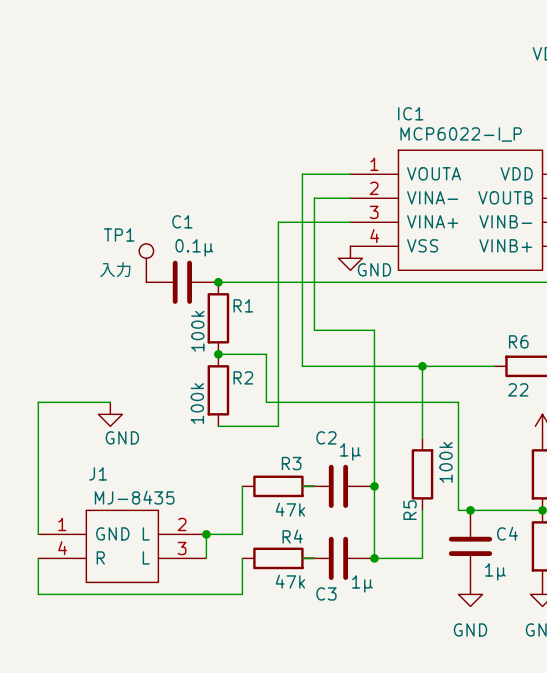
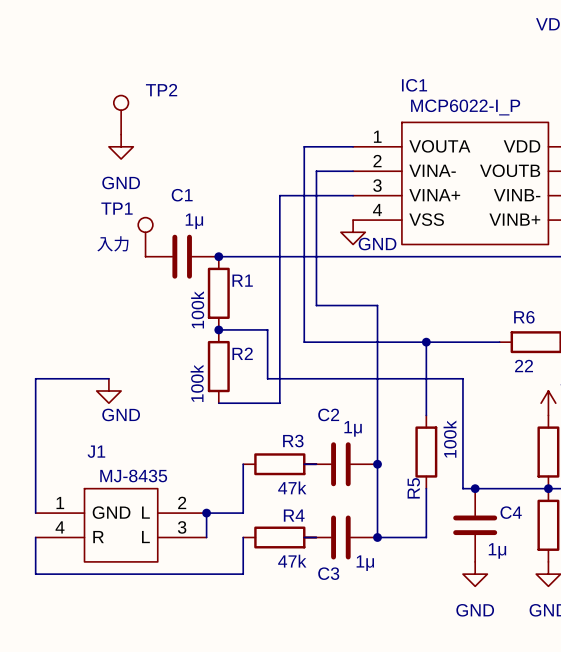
TP2: none -> (121, 115)
power symbol: none -> GND (121, 146)
C1 value: 0.1μ (194, 247) -> 1μ (194, 221)

